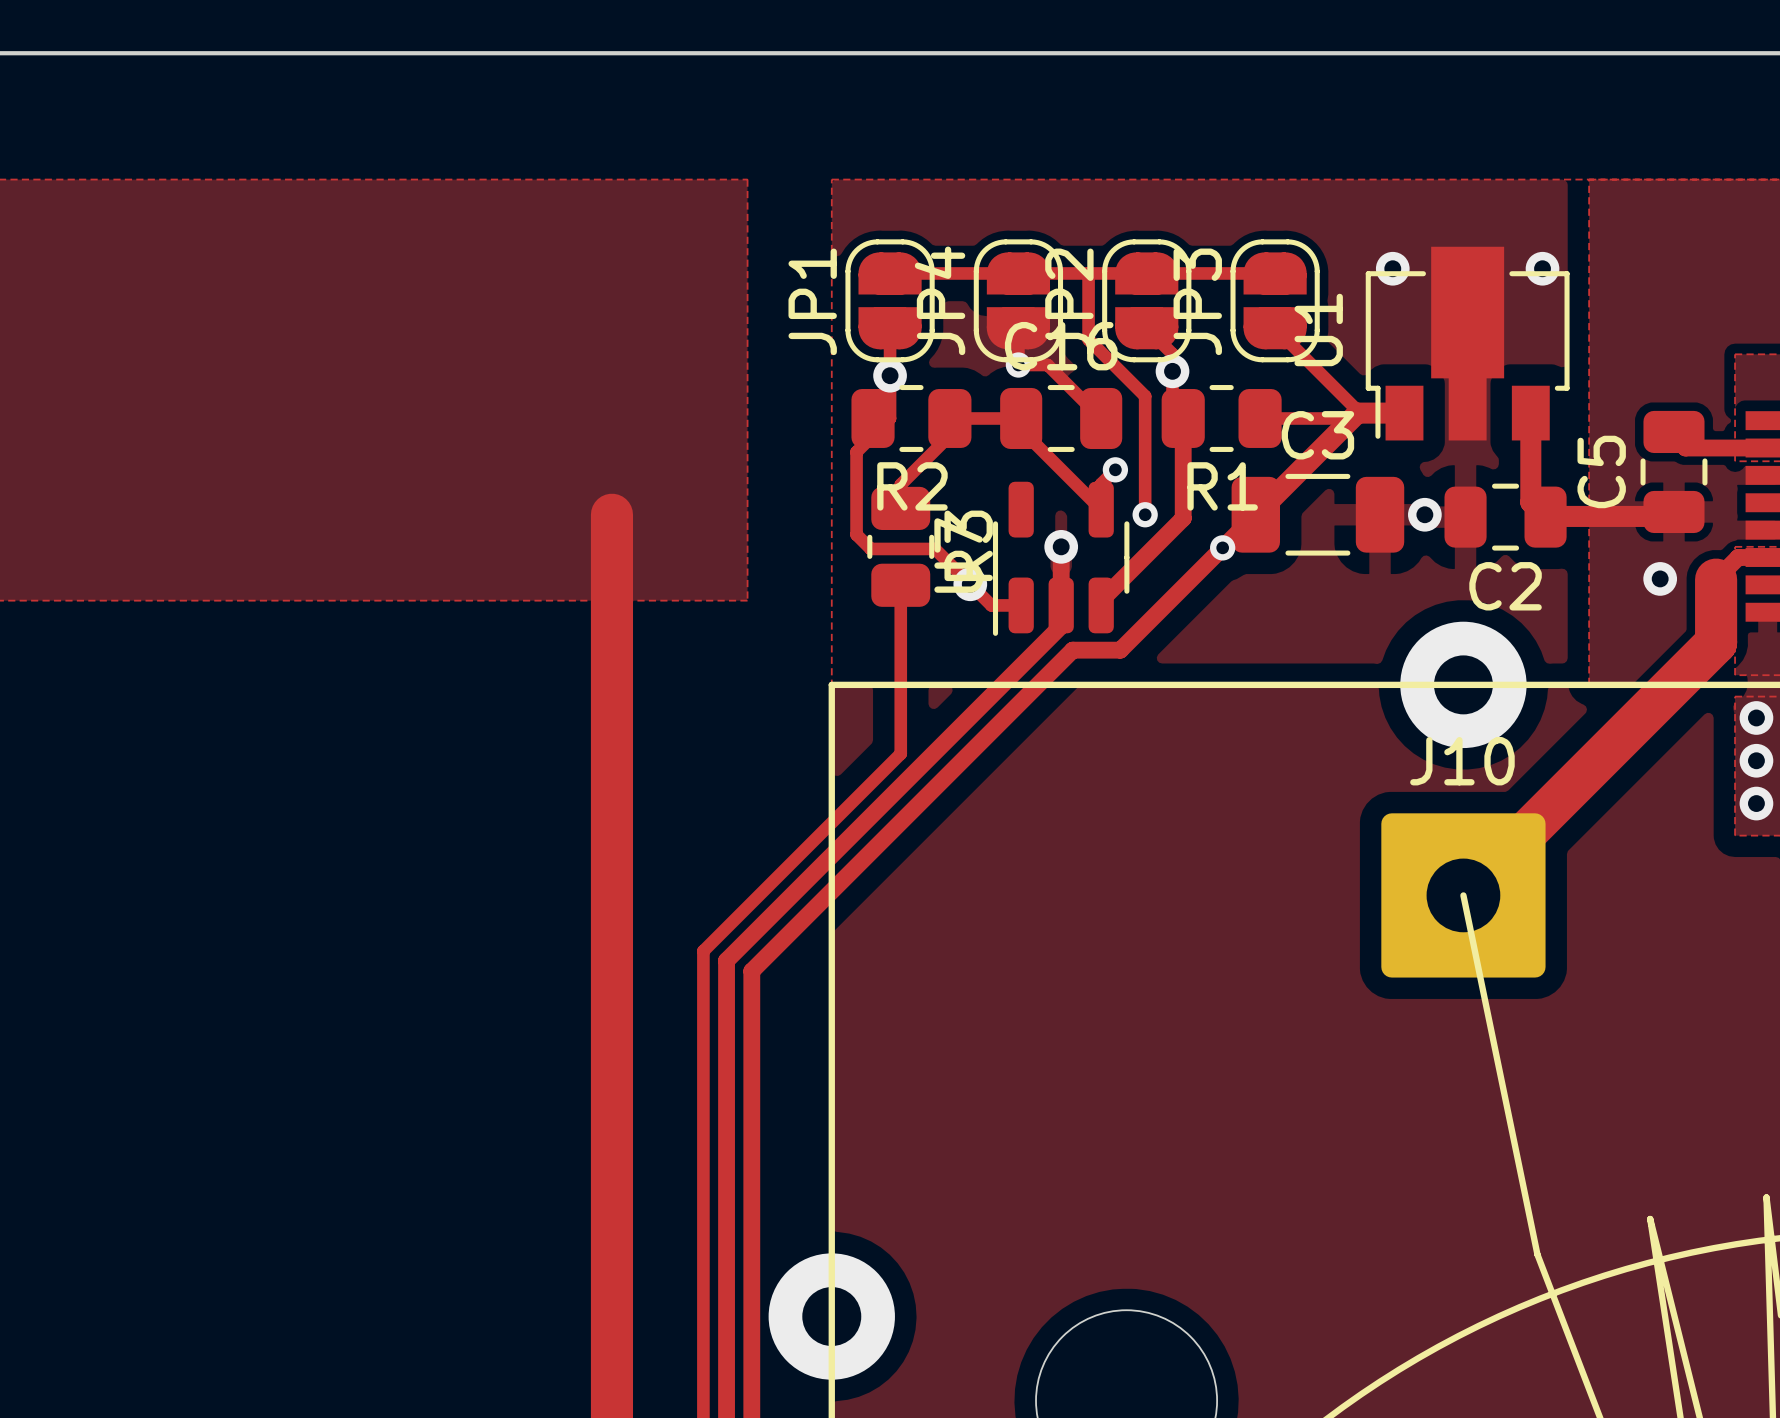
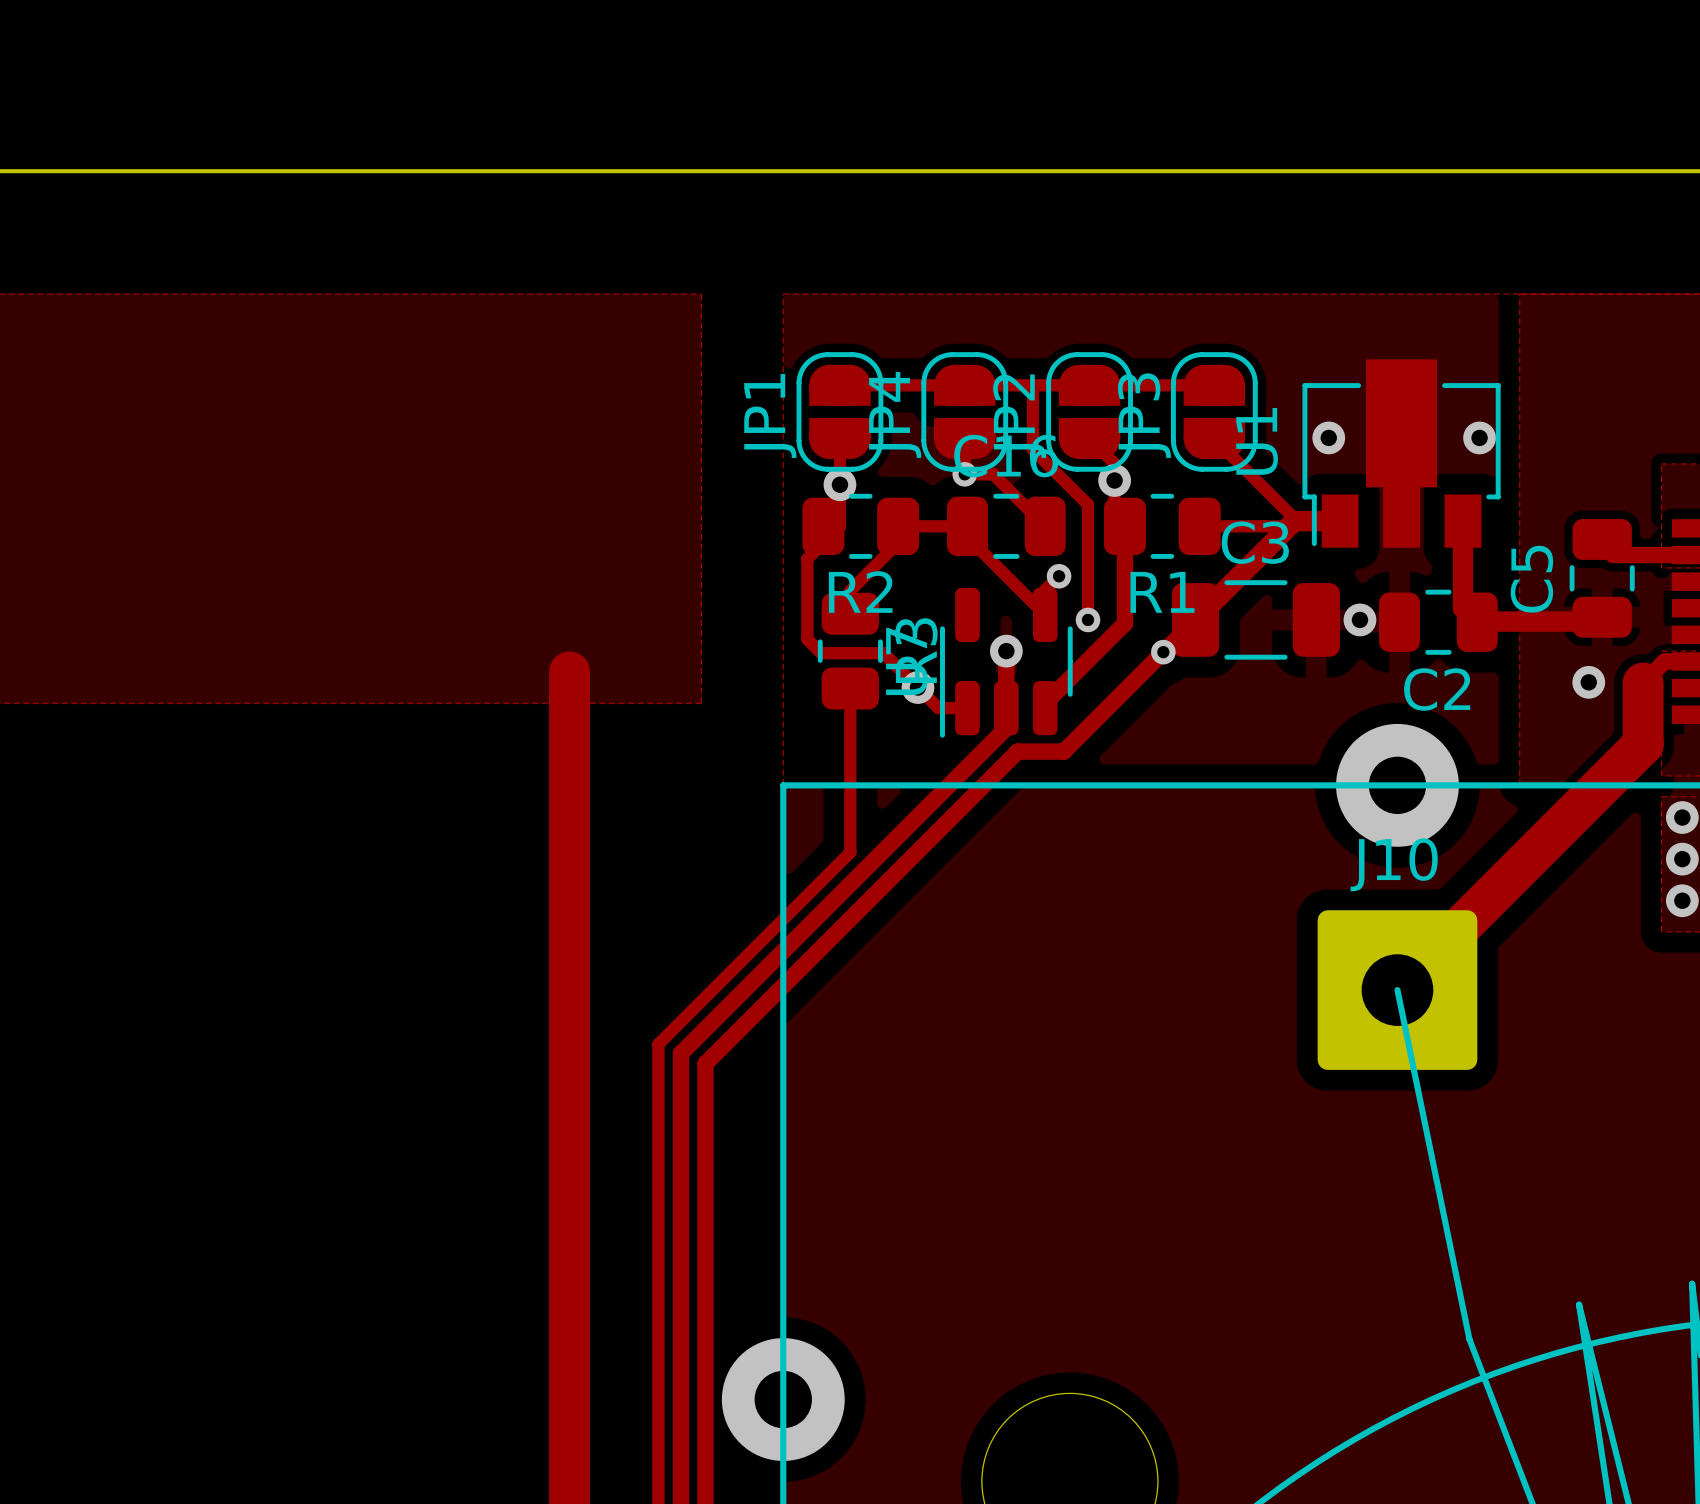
via position: (1392, 268) -> (1328, 437)
via position: (1542, 268) -> (1479, 437)
track: (611, 514) (611, 568) -> none

